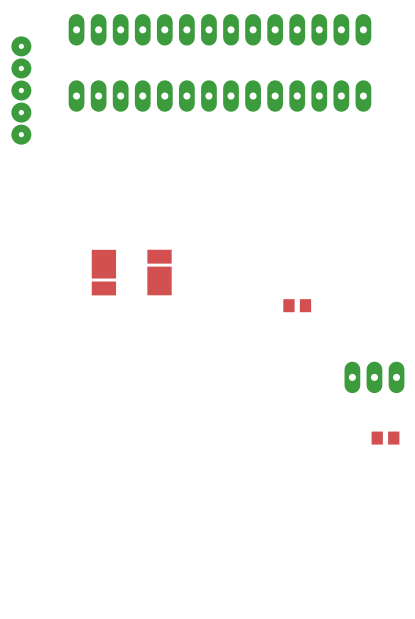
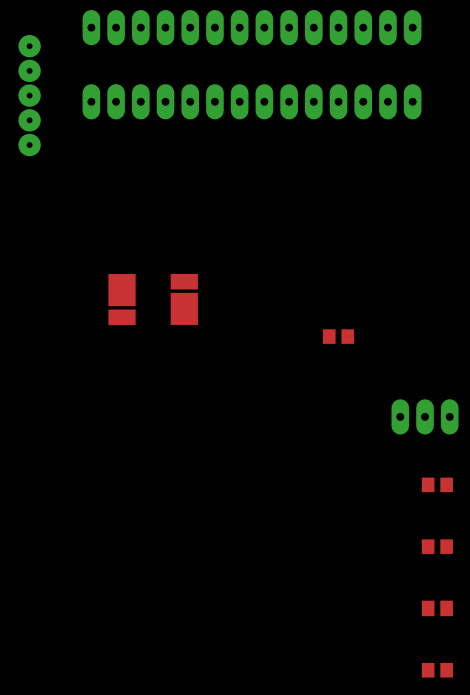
part: none -> (437, 546)
part: none -> (437, 608)
part: none -> (437, 670)

